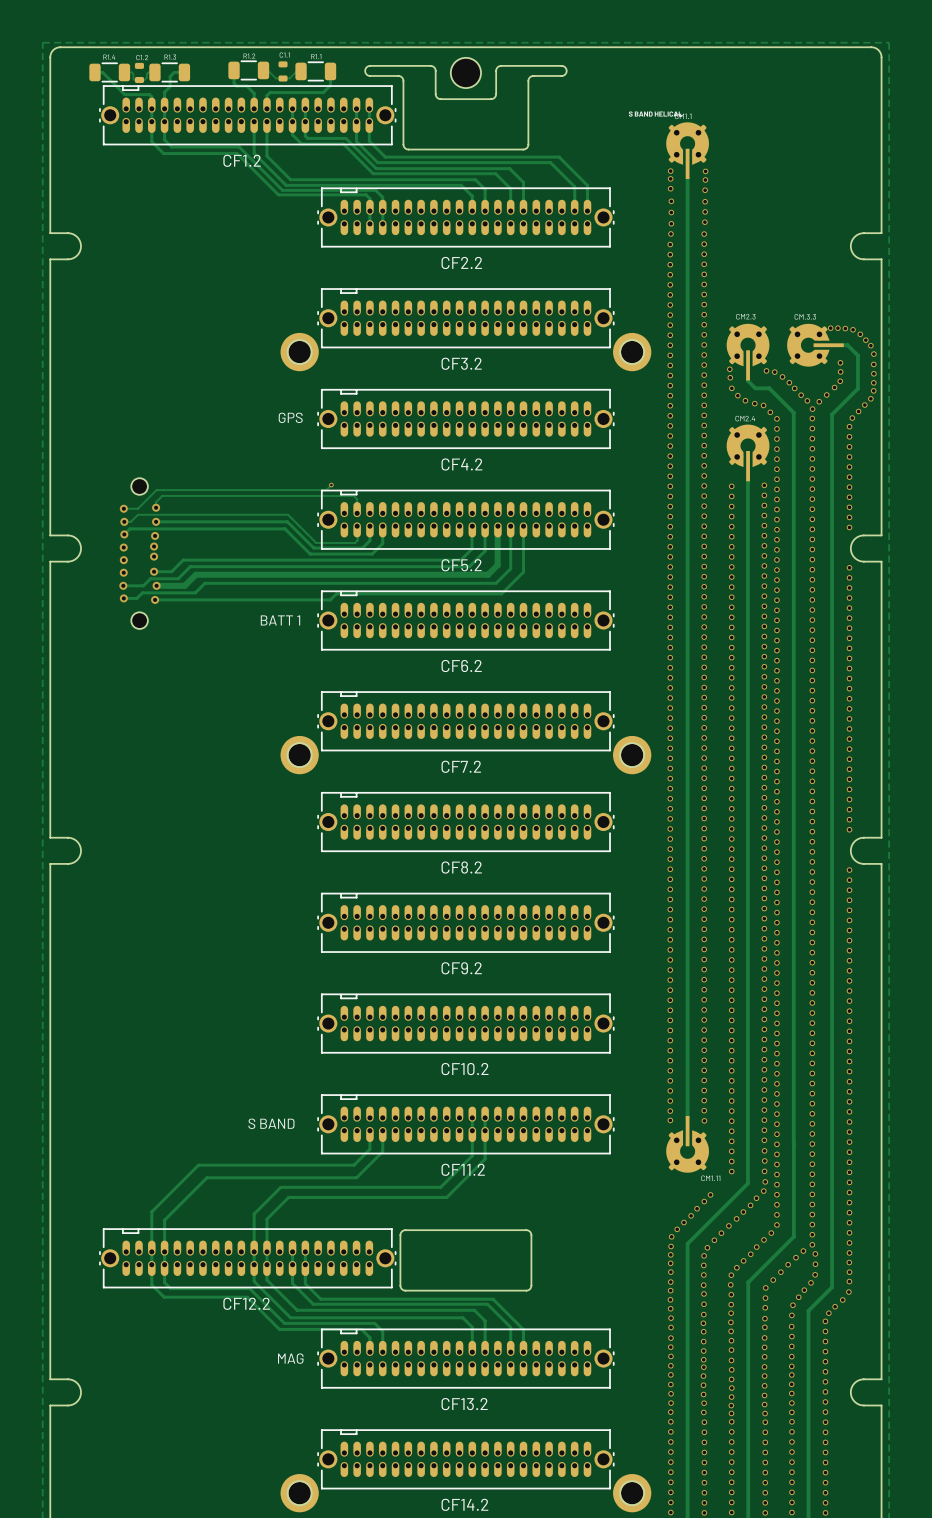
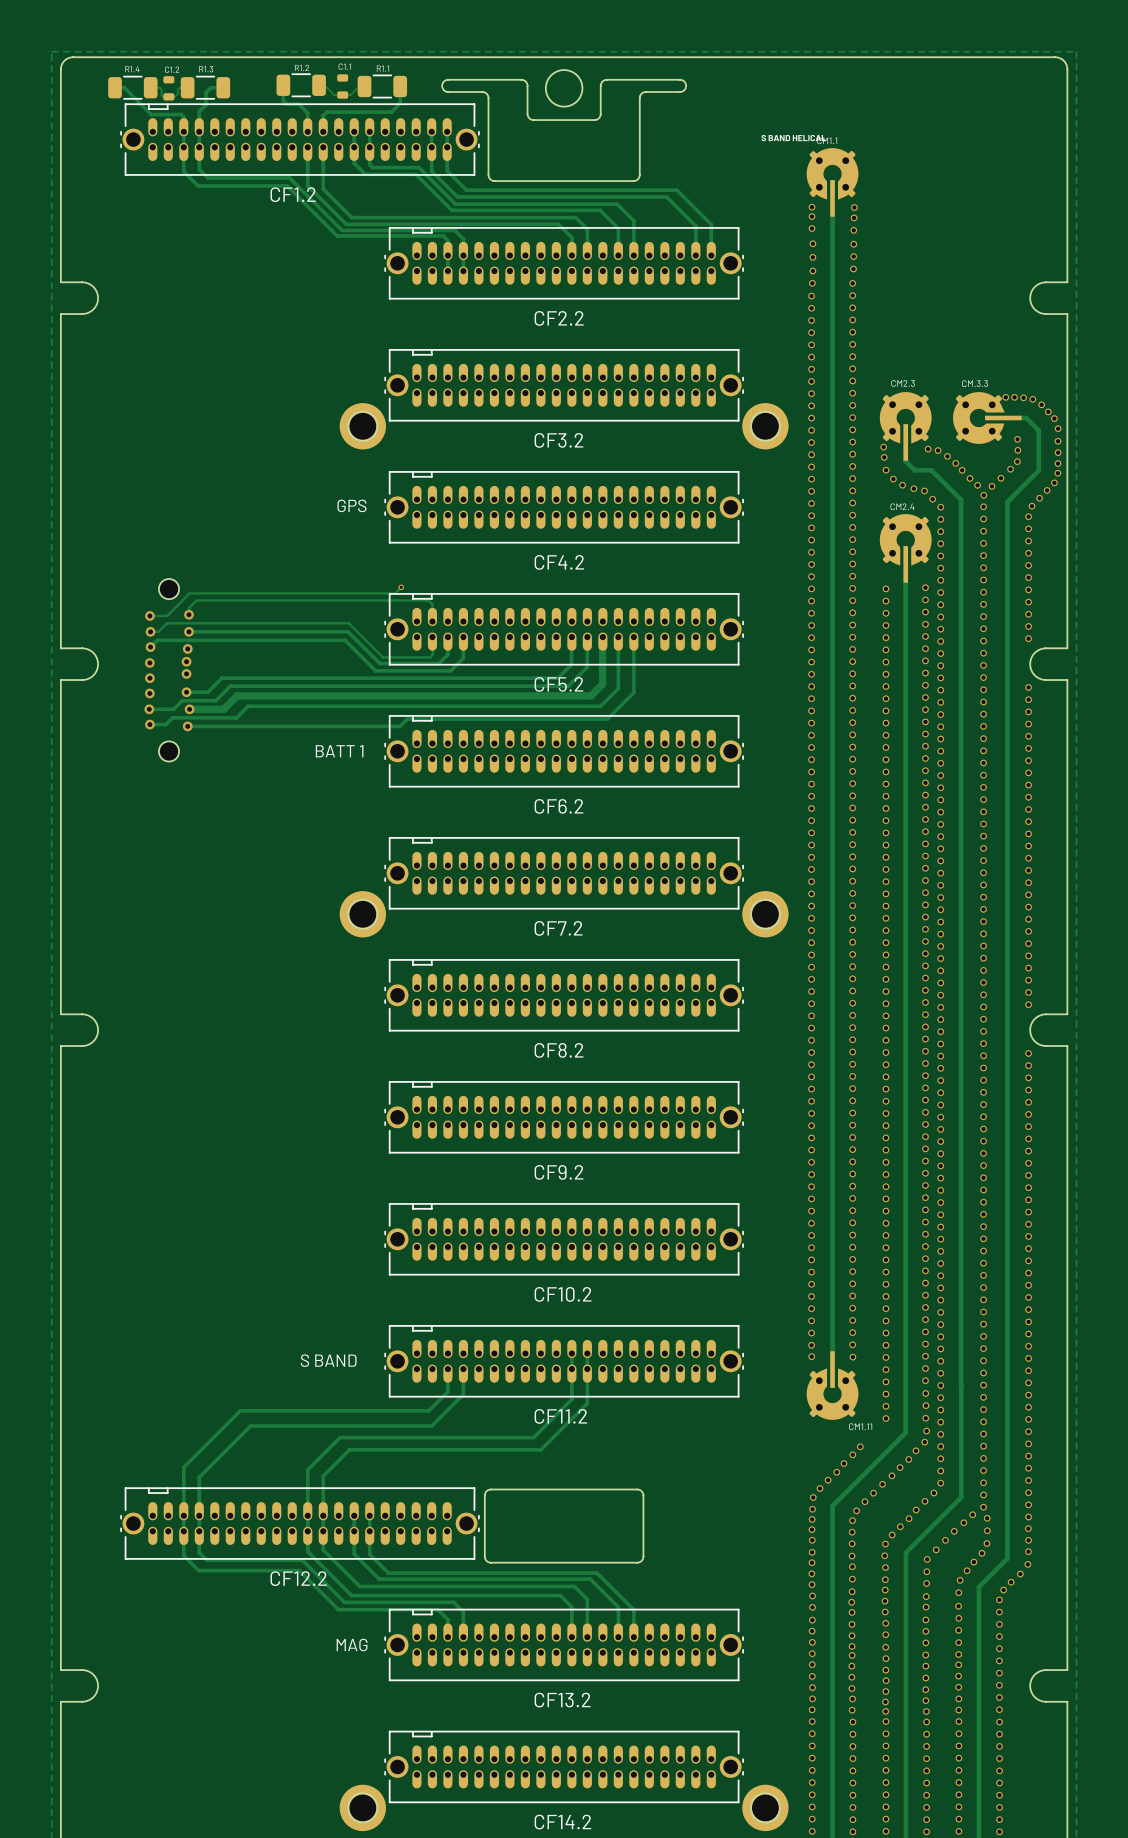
round board edge: none -> [545, 70, 583, 107]
part: (465, 72) -> none

